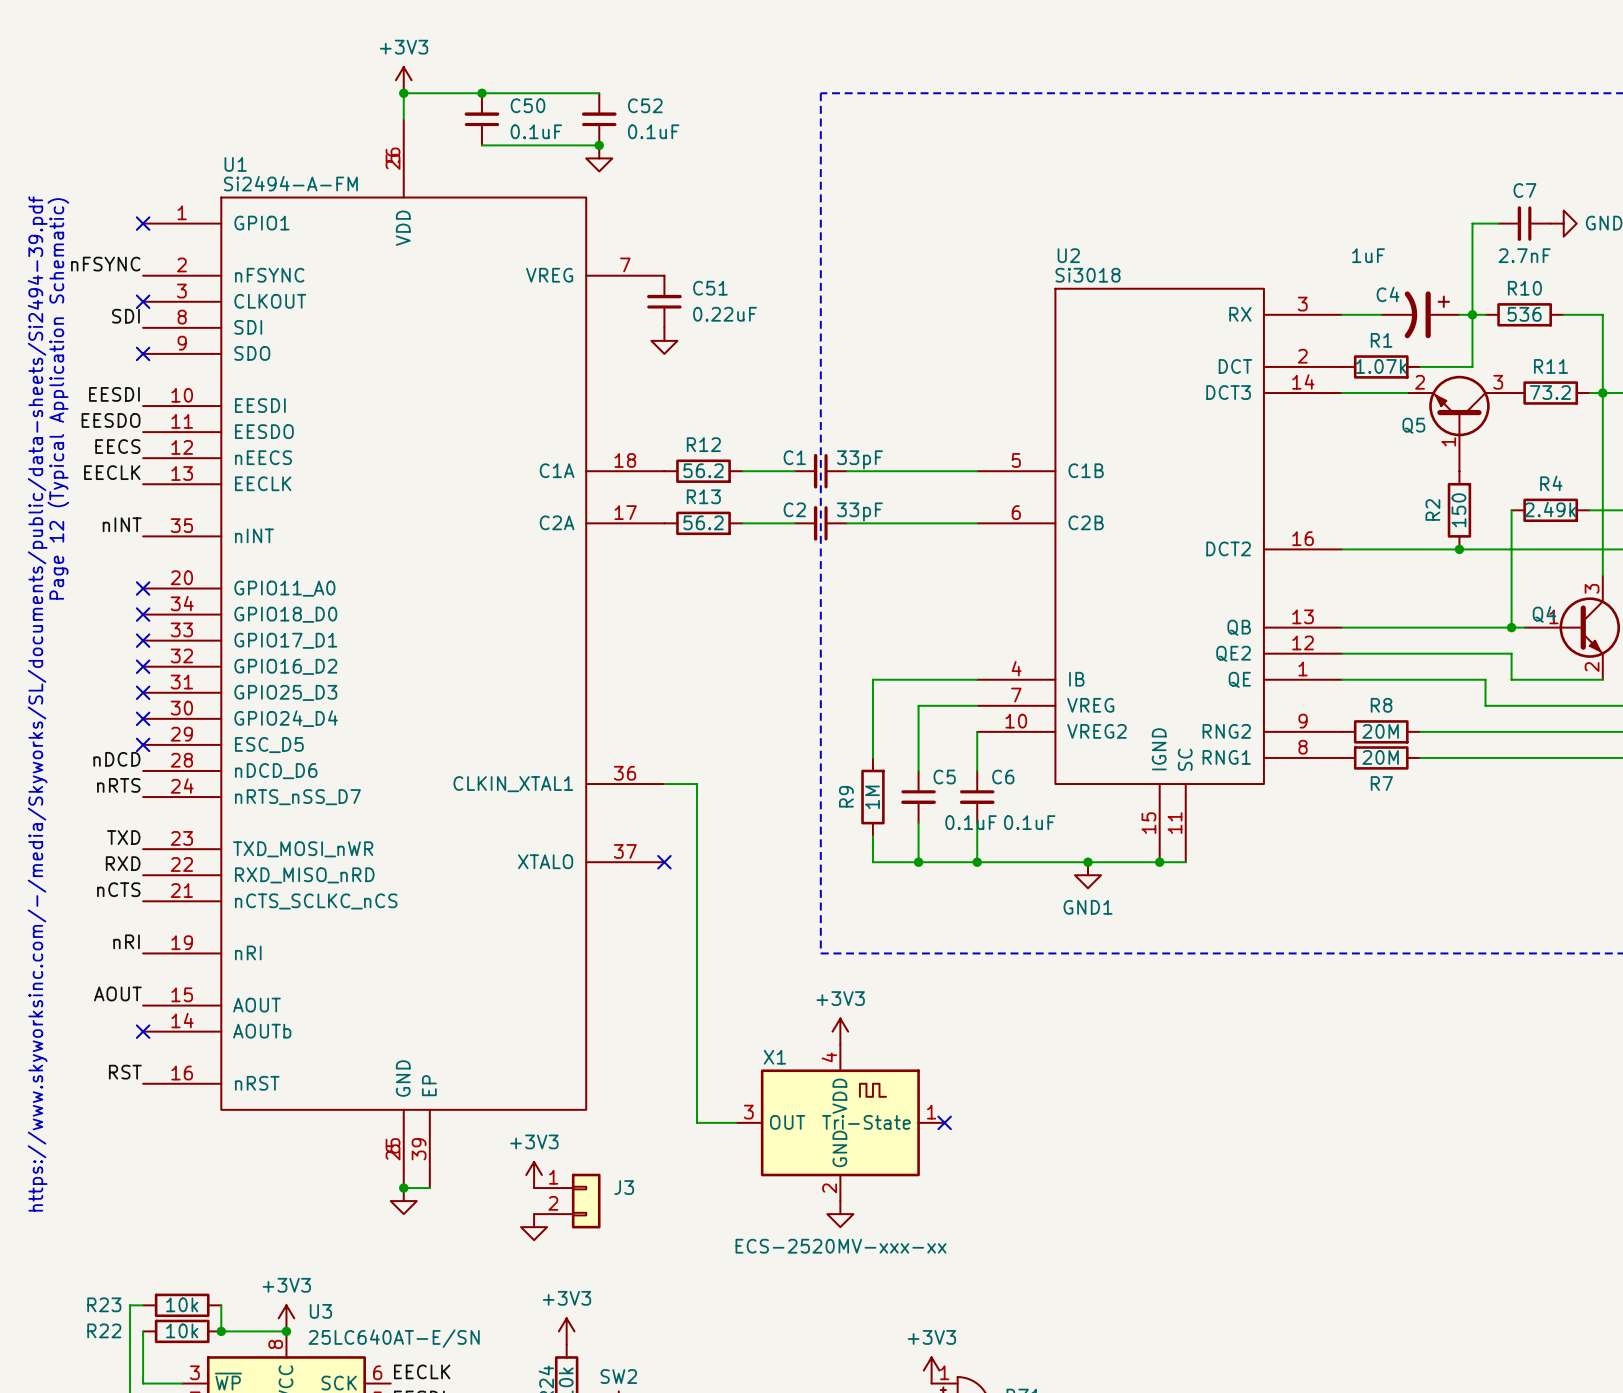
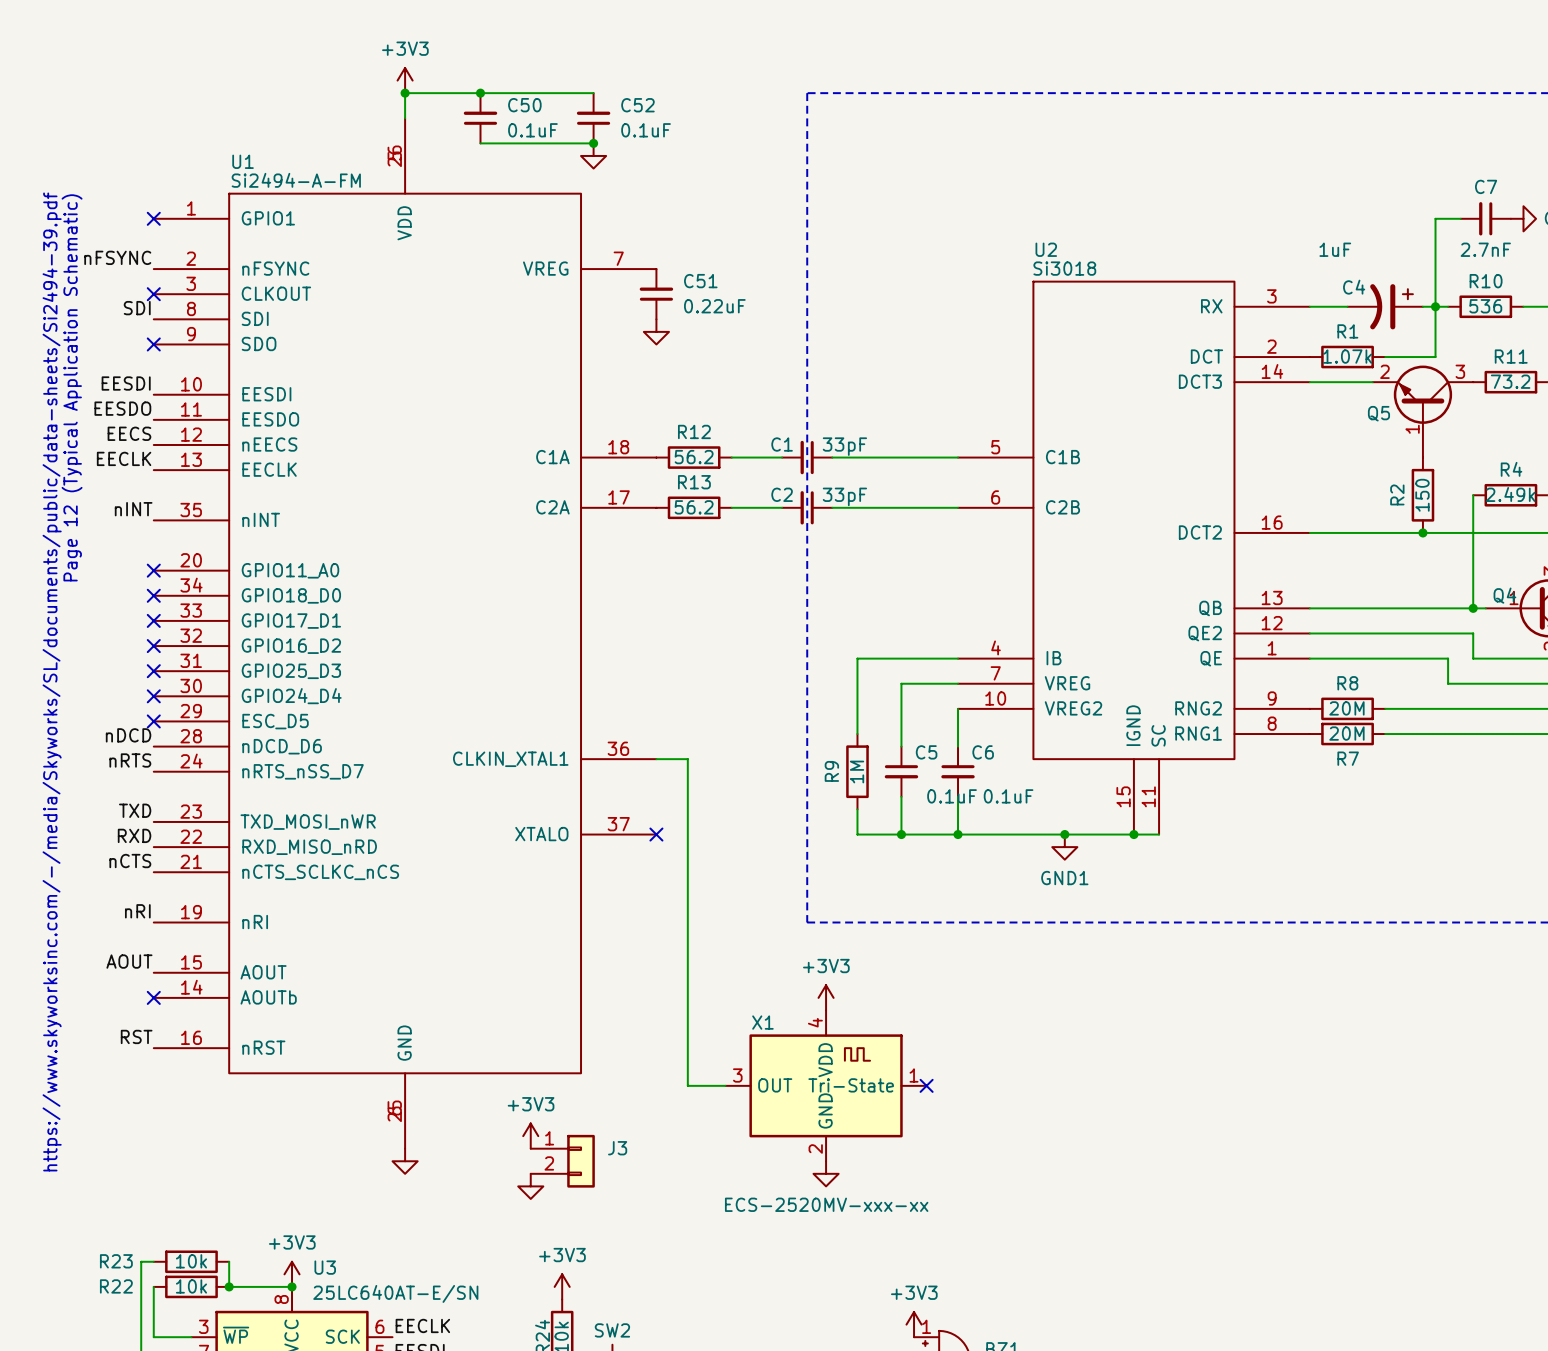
U1 symbol: [143, 119, 665, 1189] -> [153, 118, 657, 1149]
wire: (403, 1188) (429, 1188) -> none
junction: (403, 1188) -> none

